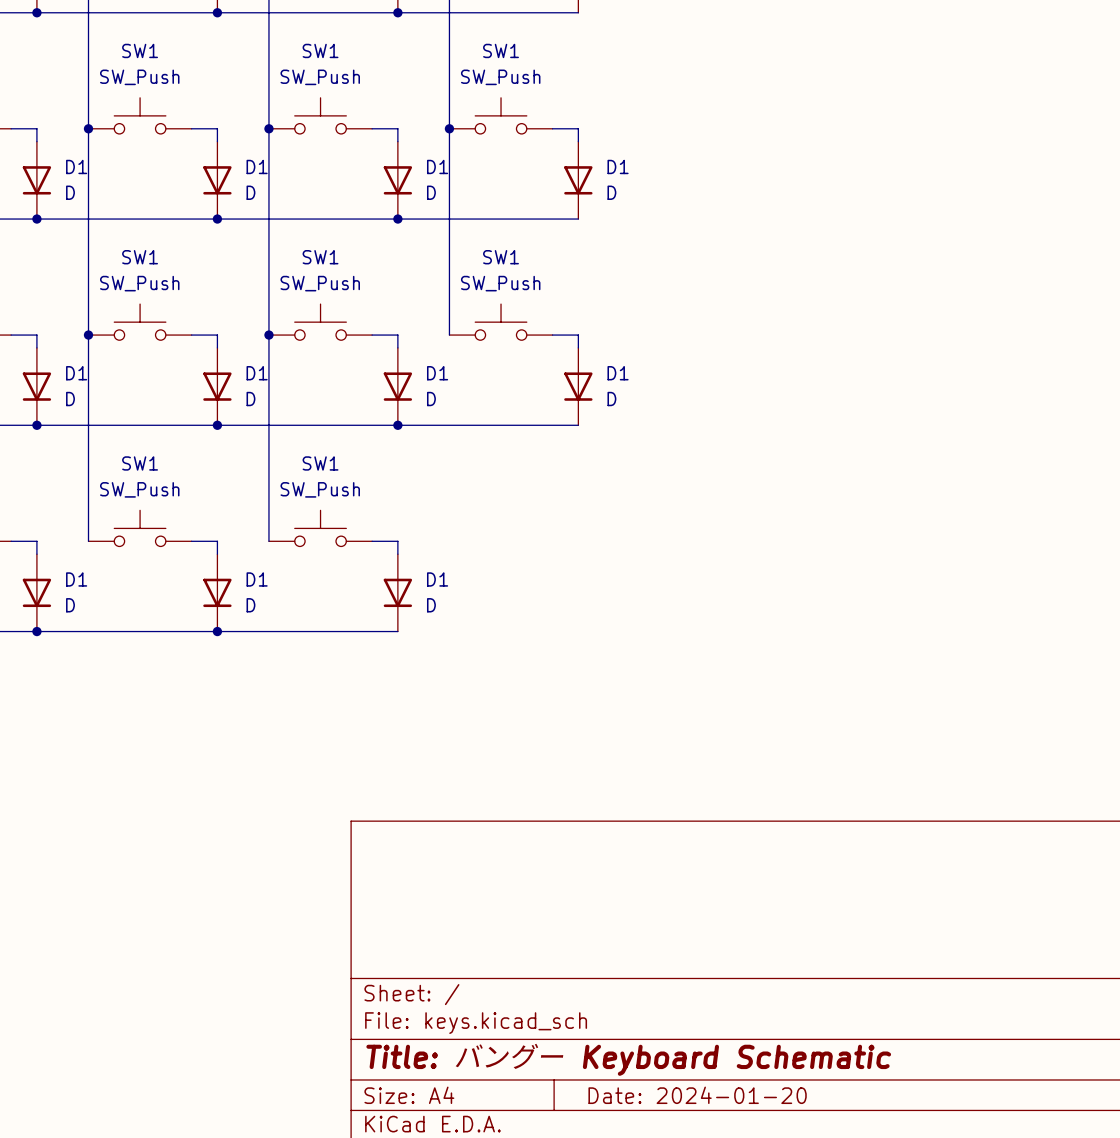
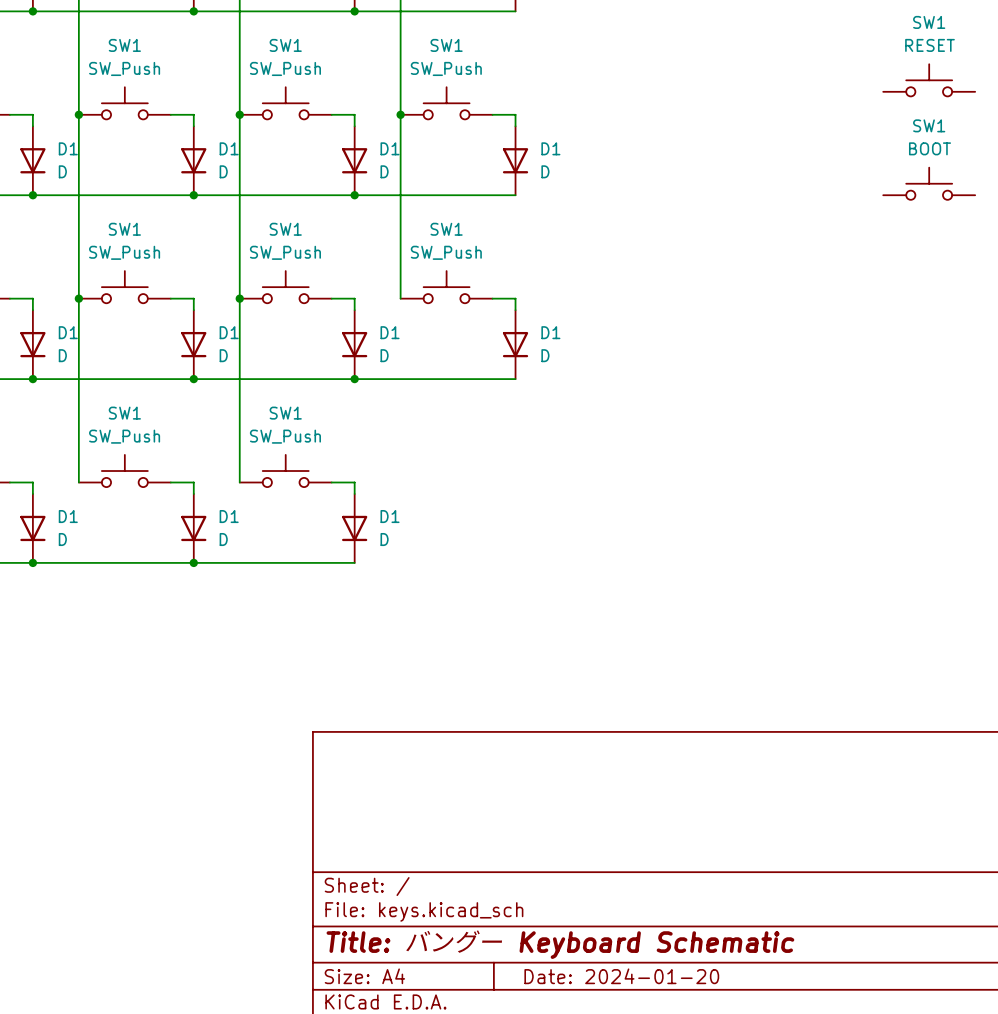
SW1: none -> RESET (929, 80)
SW1: none -> BOOT (929, 183)

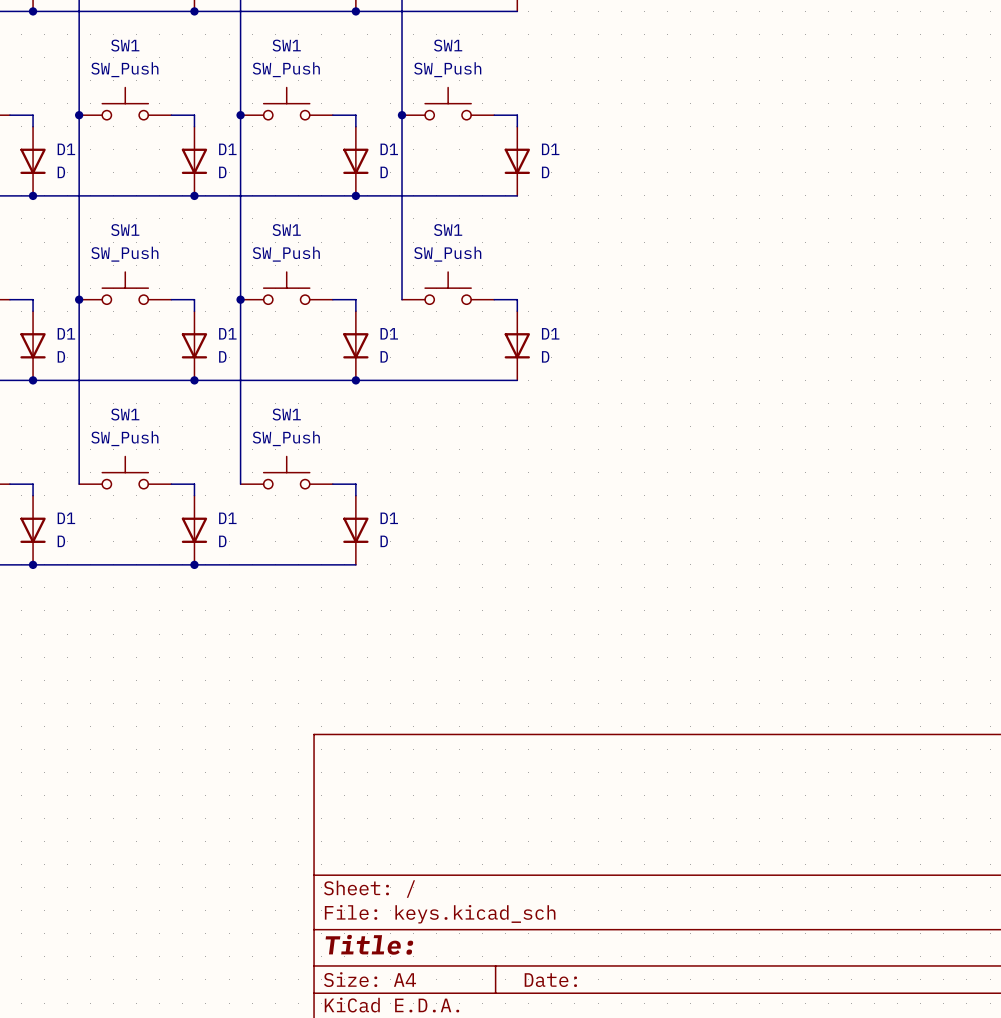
SW1: RESET (929, 80) -> none
SW1: BOOT (929, 183) -> none
title block: Title: バングー Keyboard Schematic (560, 943) -> Title: (369, 944)
title block: Date: 2024-01-20 (621, 976) -> Date: (550, 980)

